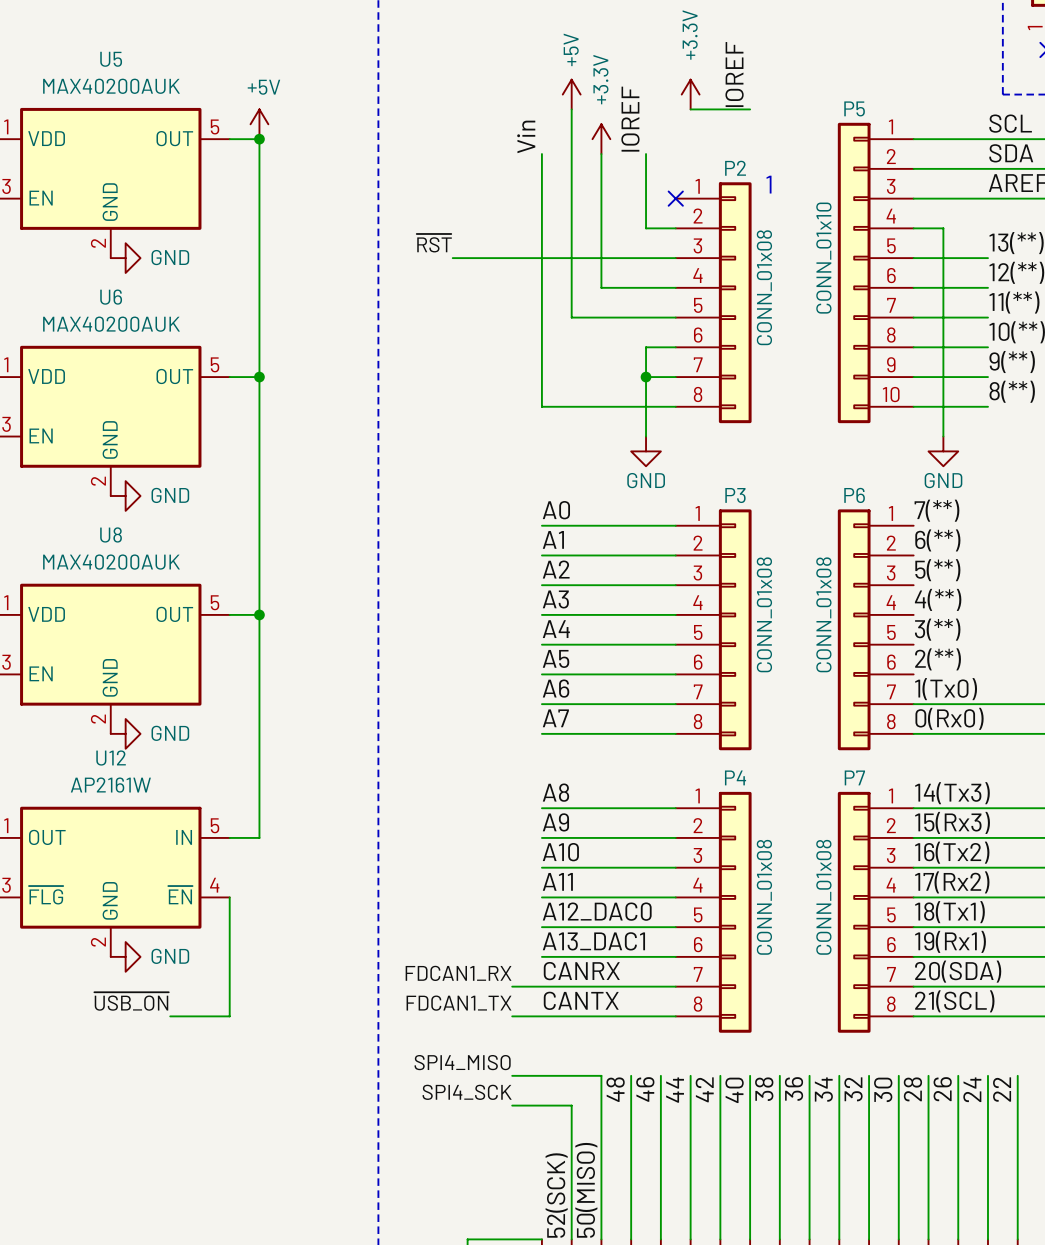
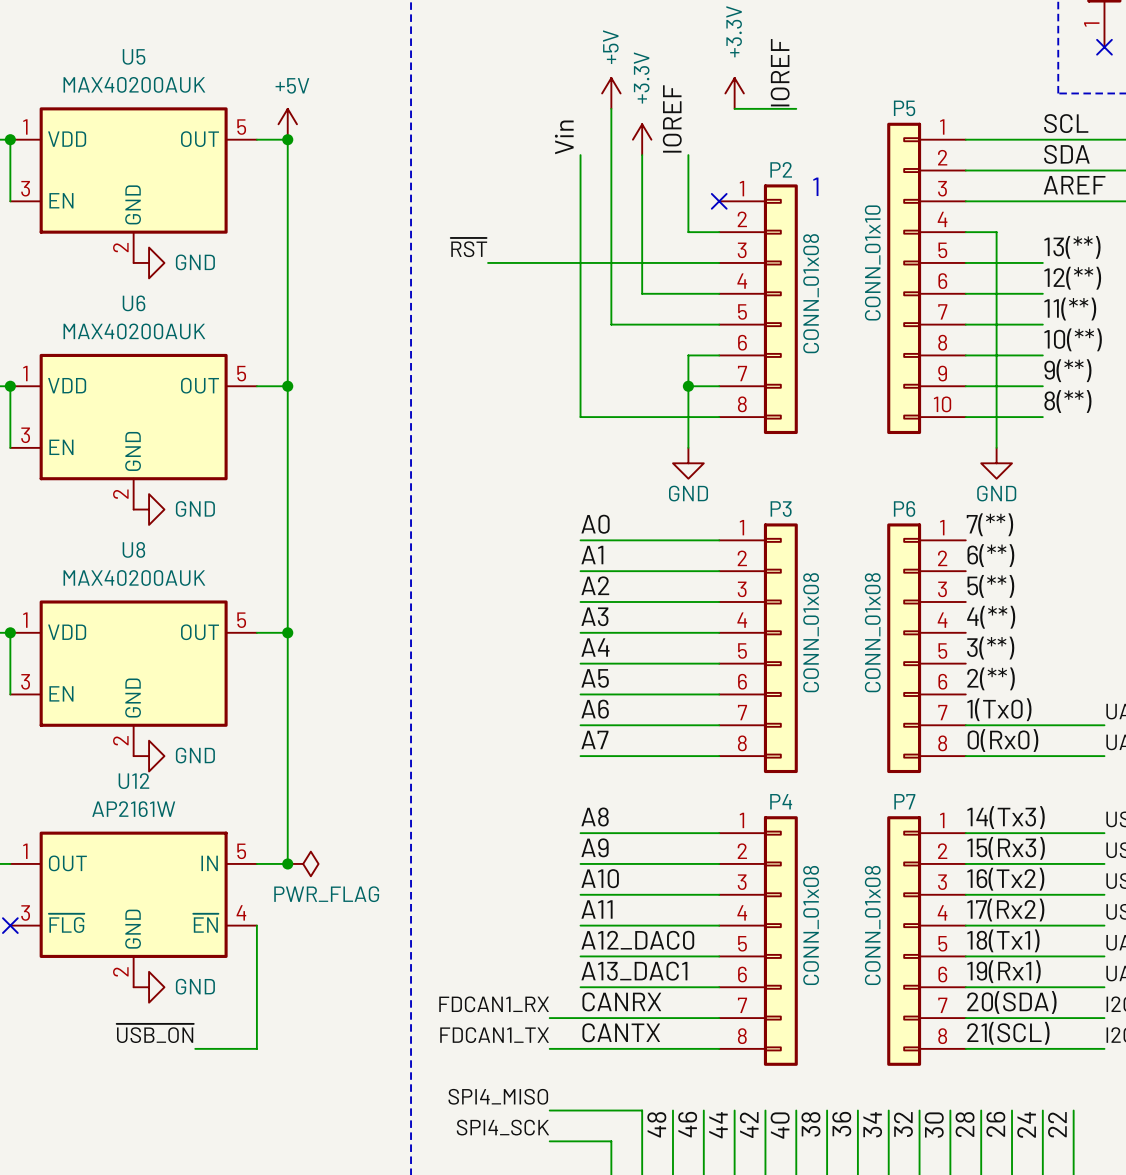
junction: none -> (287, 863)
power symbol: none -> PWR_FLAG (303, 863)

